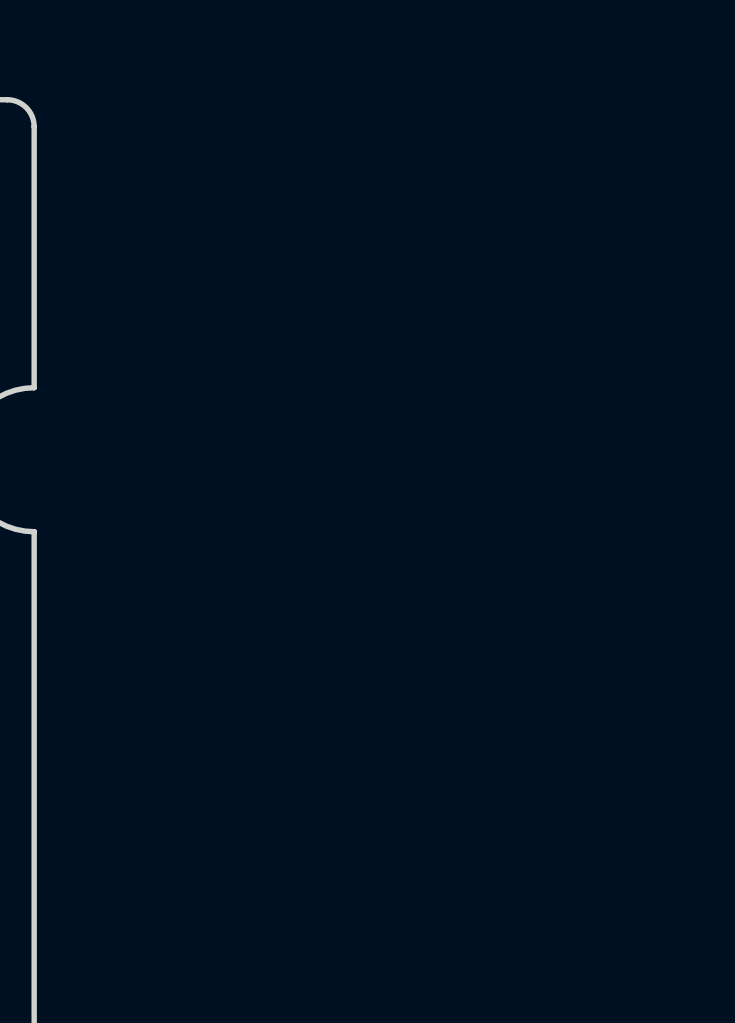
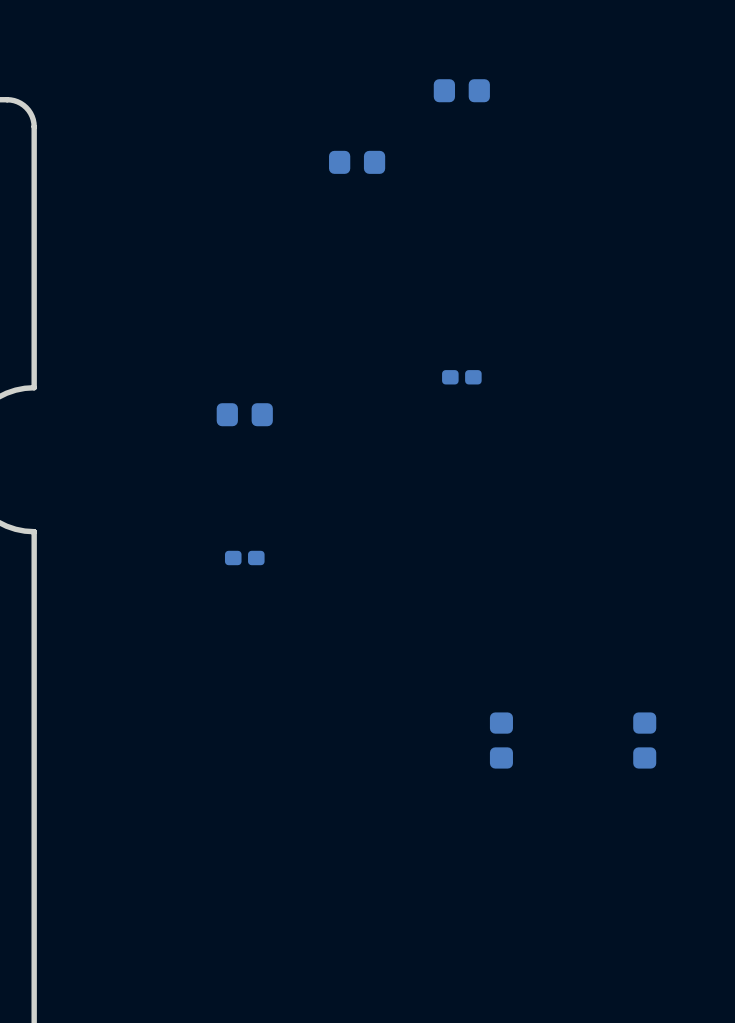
part: none -> (461, 90)
part: none -> (357, 162)
part: none -> (461, 377)
part: none -> (244, 414)
part: none -> (244, 557)
part: none -> (501, 740)
part: none -> (644, 740)

